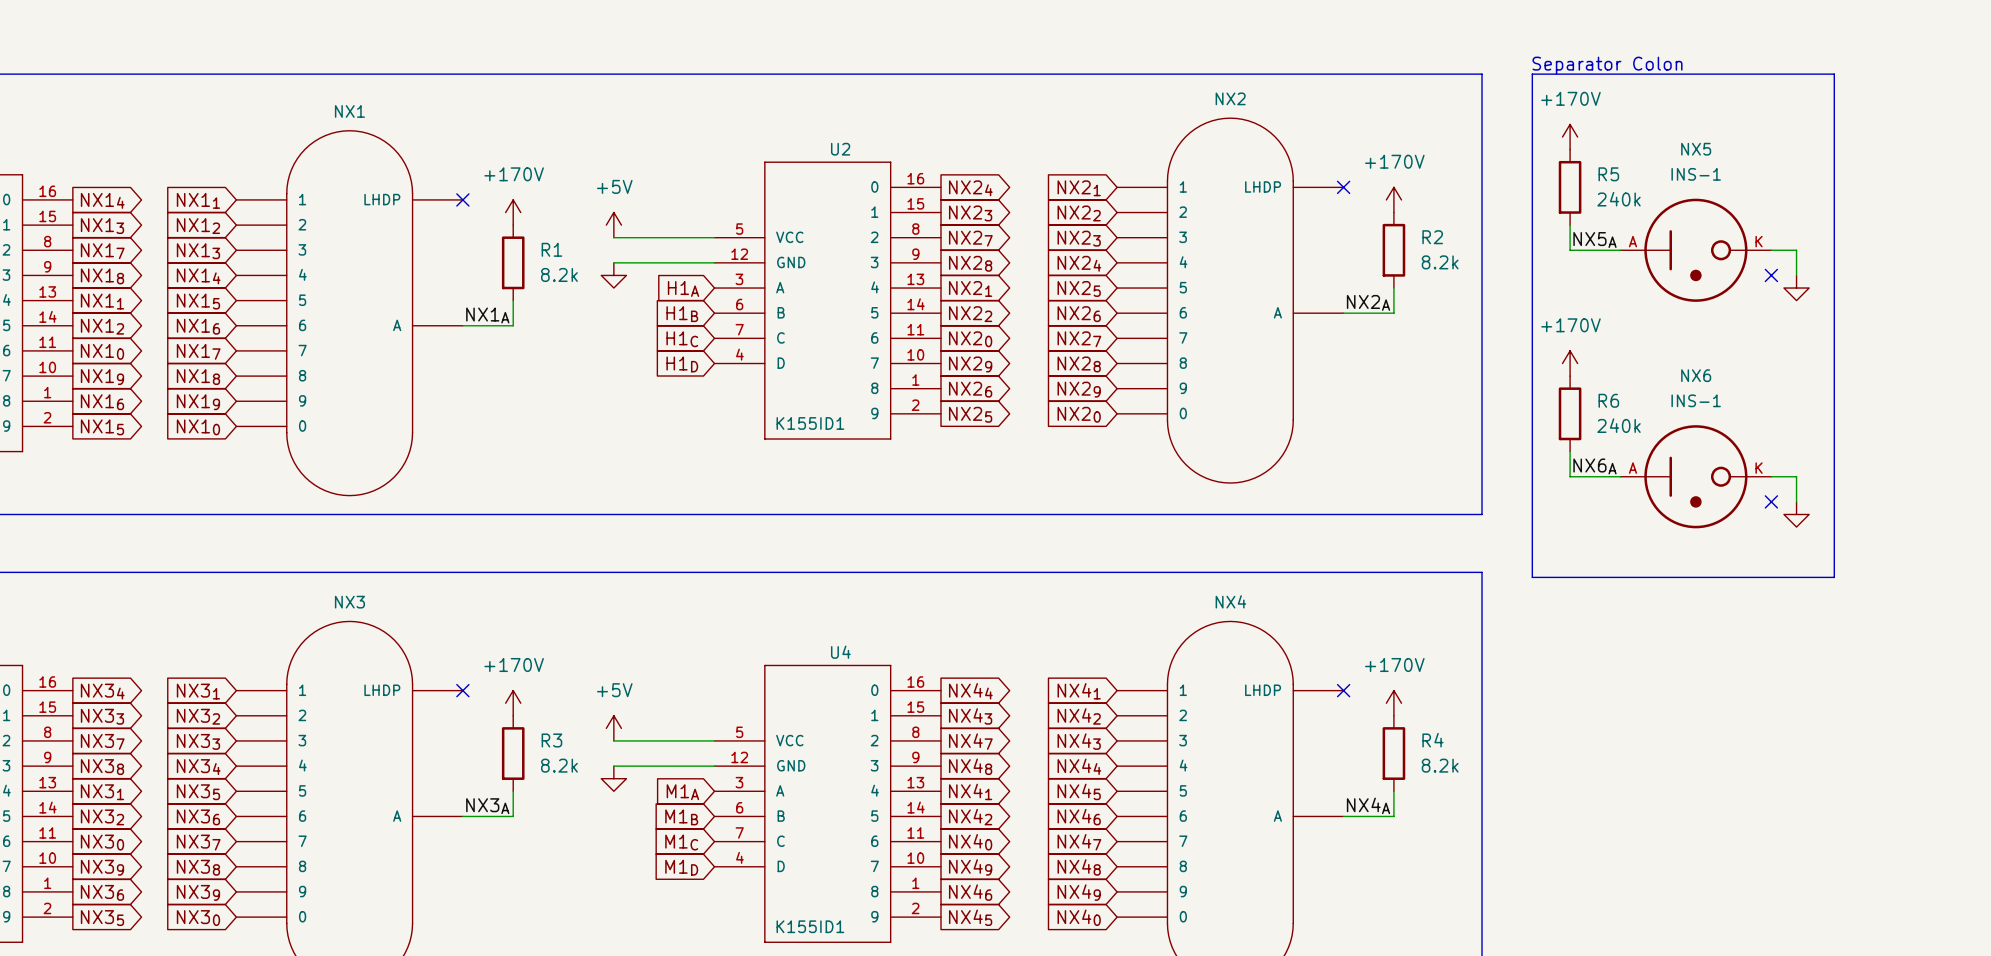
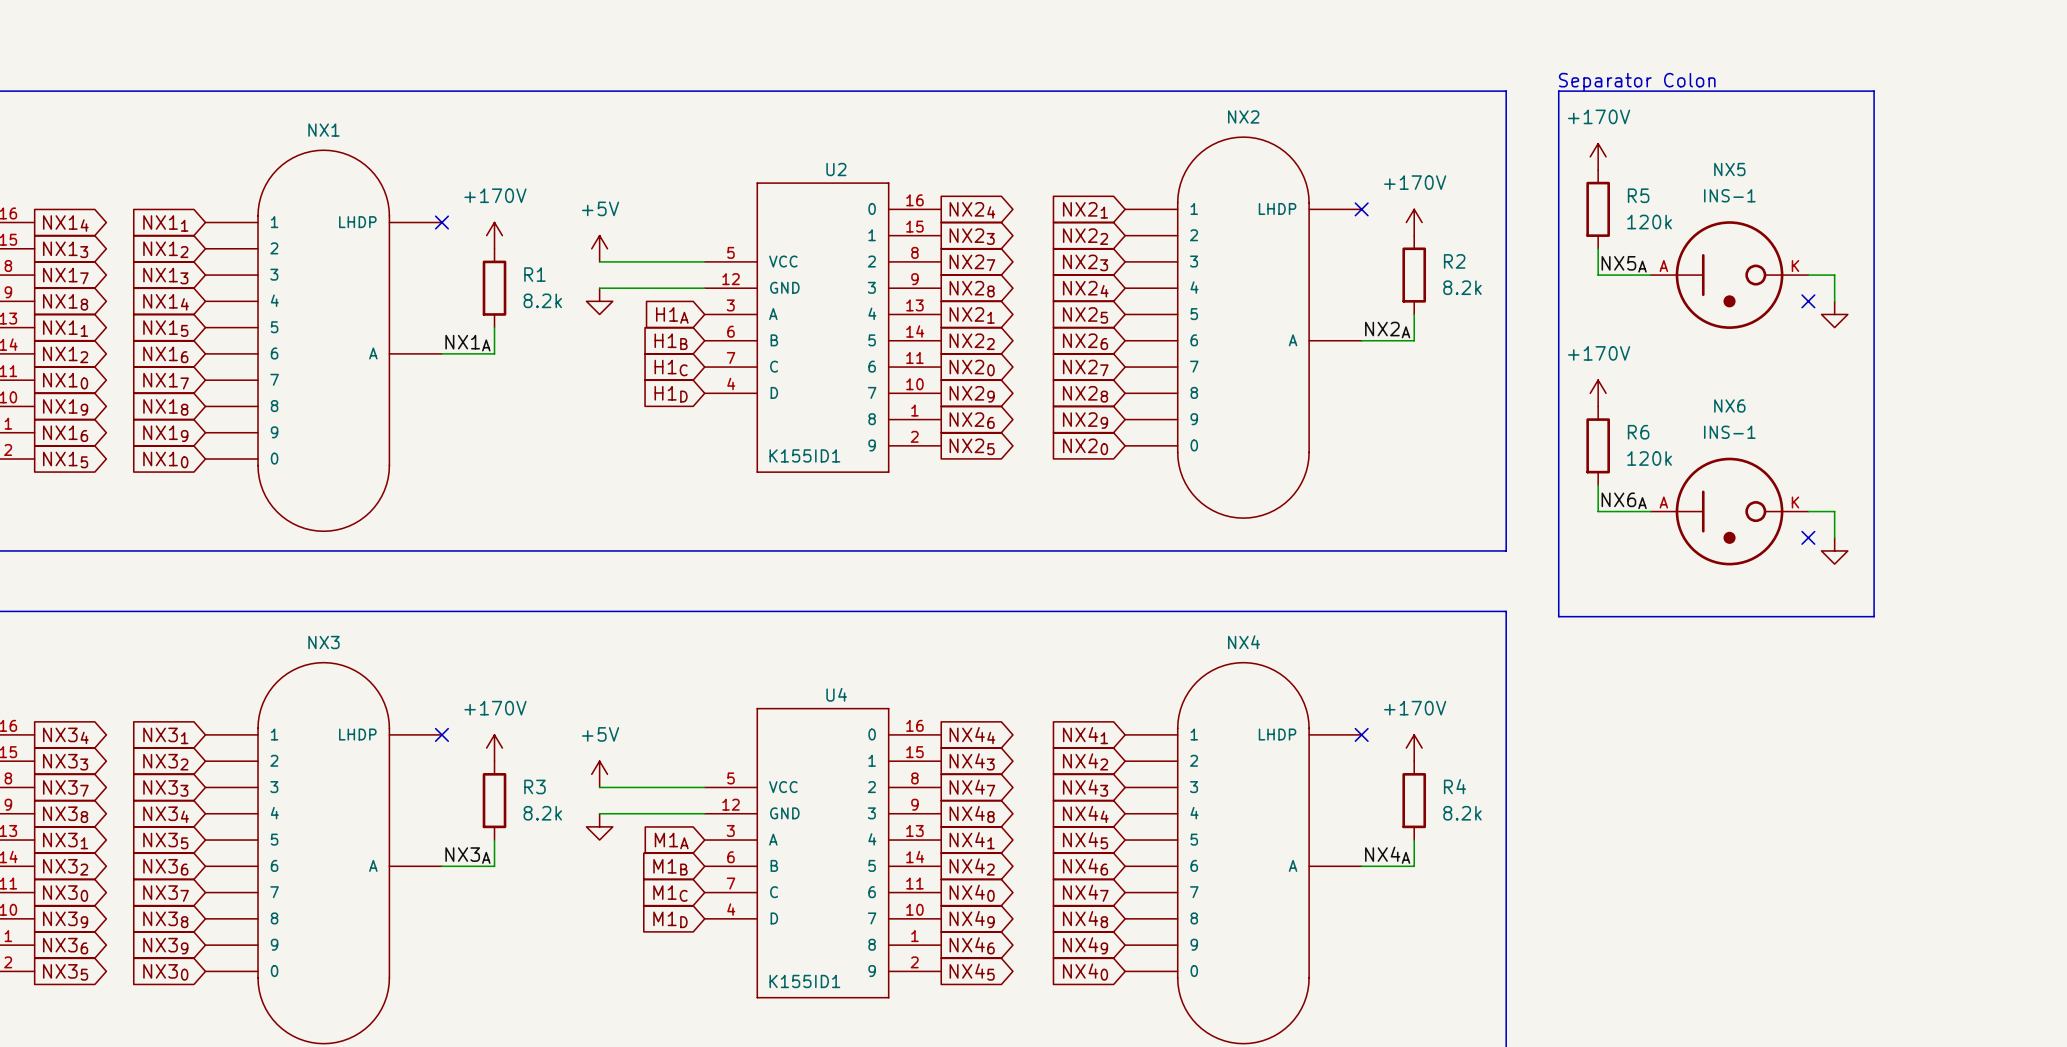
R5 value: 240k (1619, 199) -> 120k (1649, 222)
R6 value: 240k (1619, 425) -> 120k (1649, 458)

